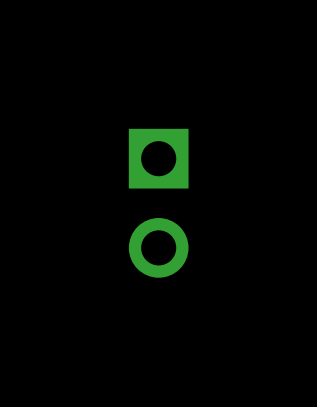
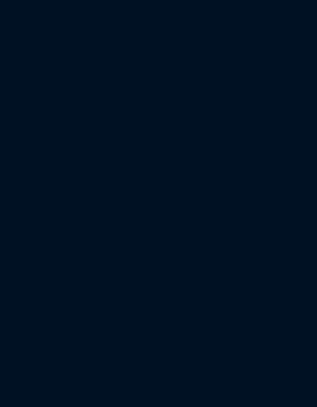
part: (158, 203) -> none

